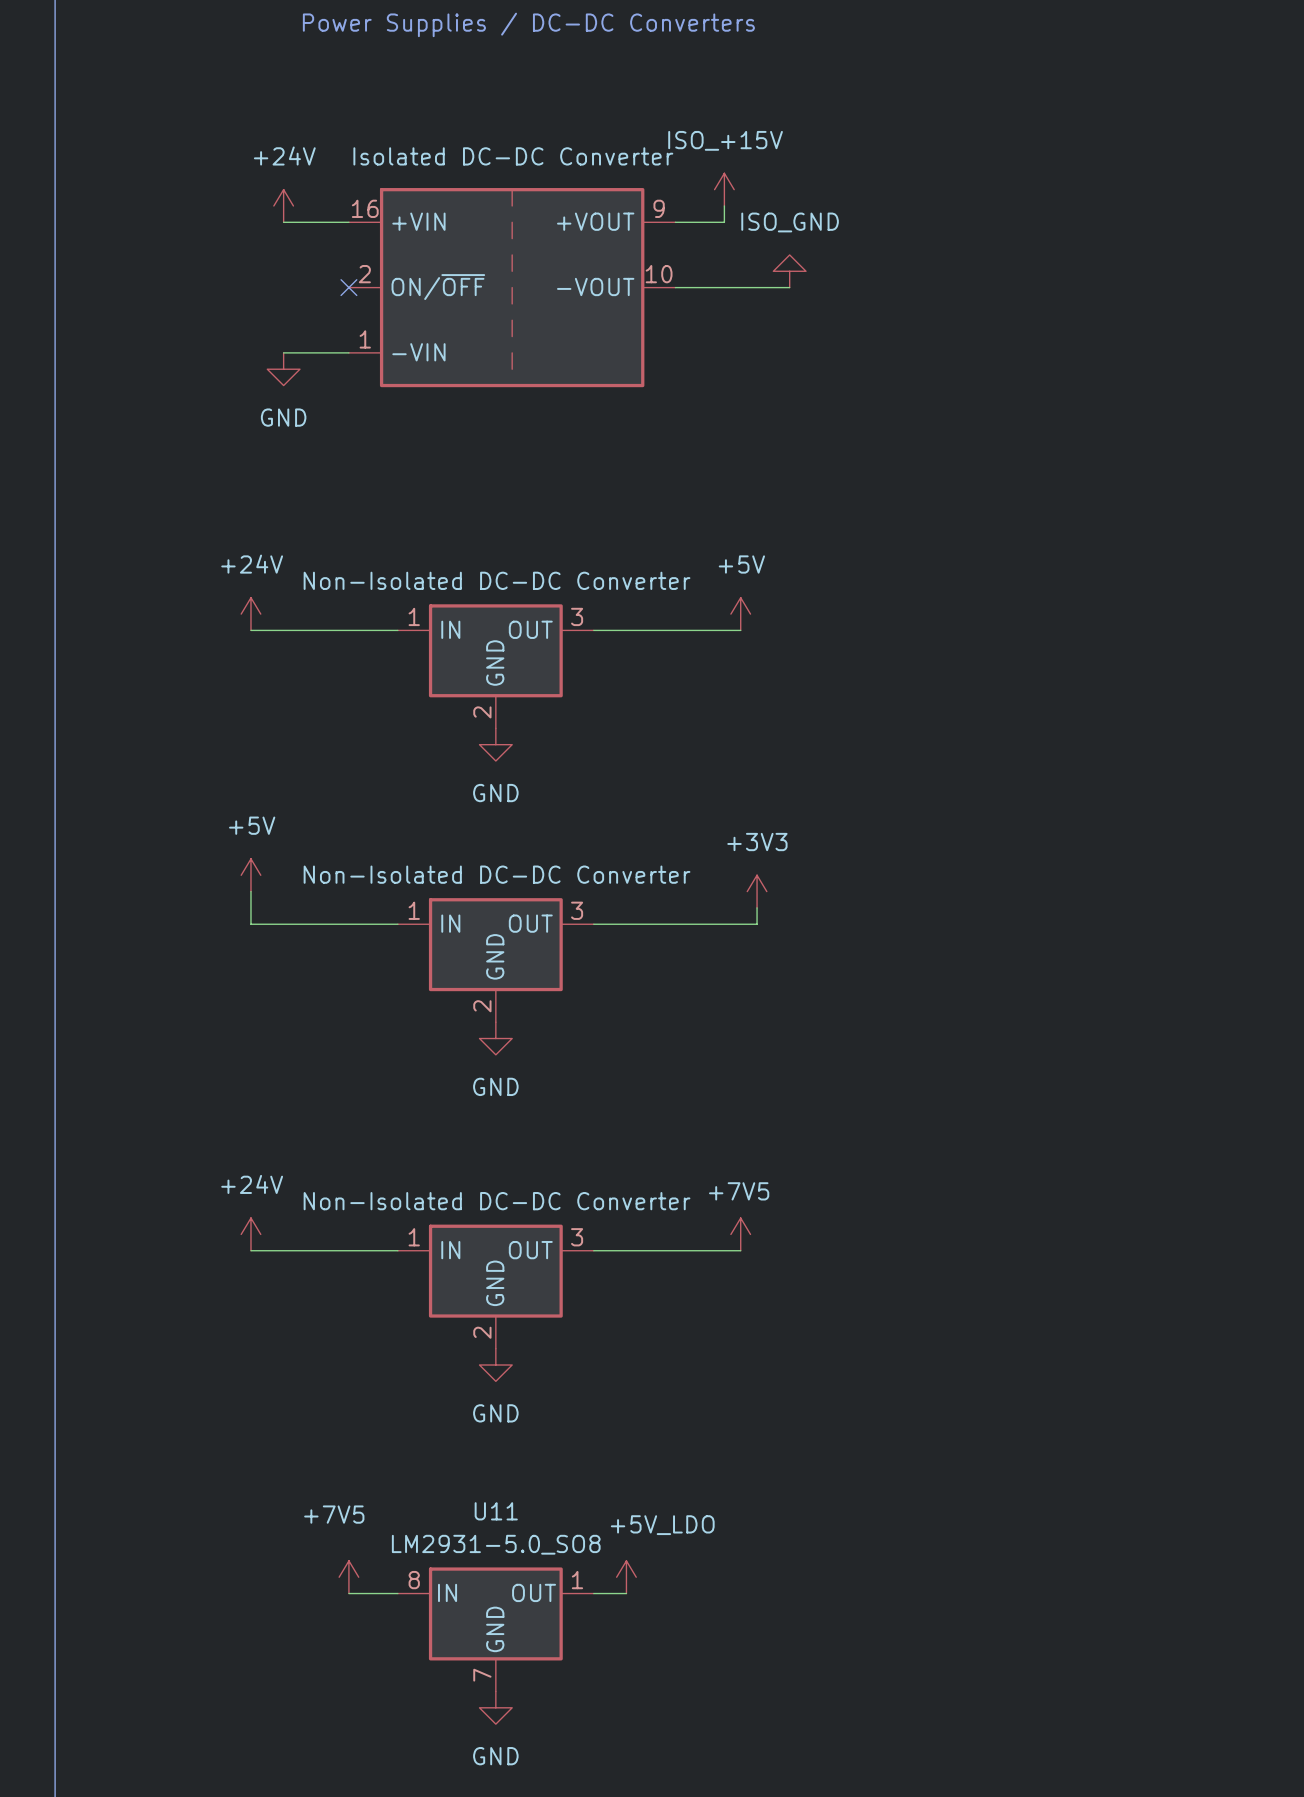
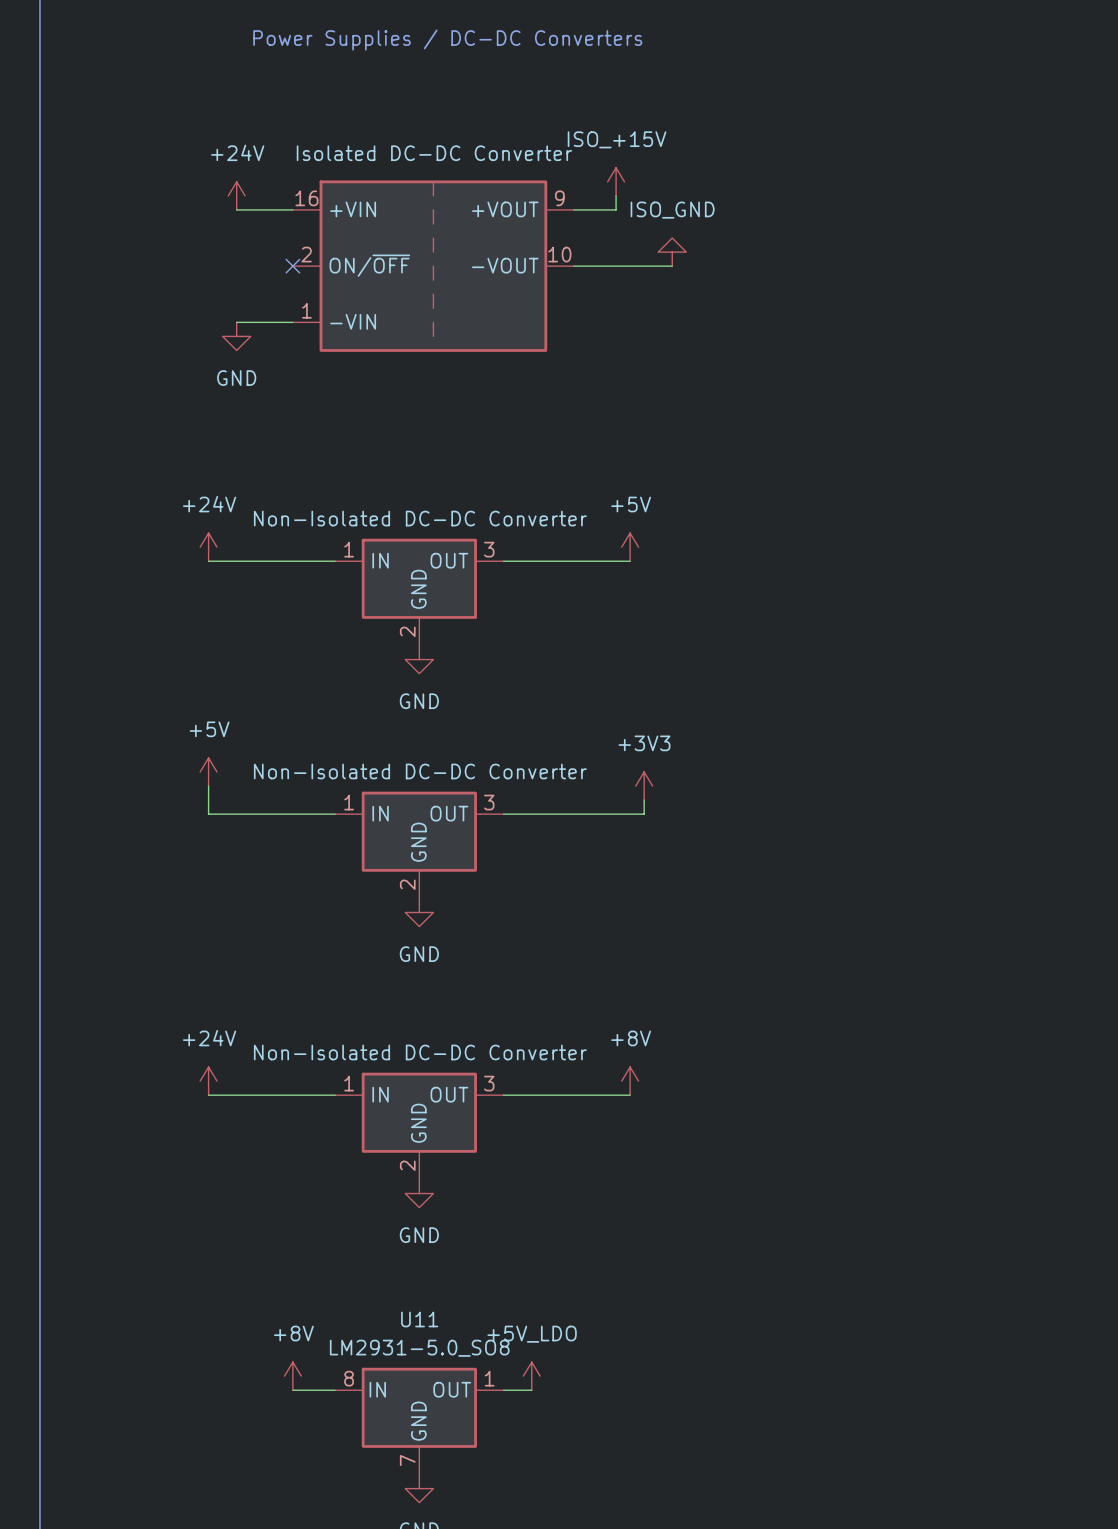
power symbol: +7V5 (740, 1234) -> +8V (630, 1081)
power symbol text position: +5V_LDO (662, 1525) -> +5V_LDO (532, 1334)
power symbol: +7V5 (348, 1577) -> +8V (292, 1376)

